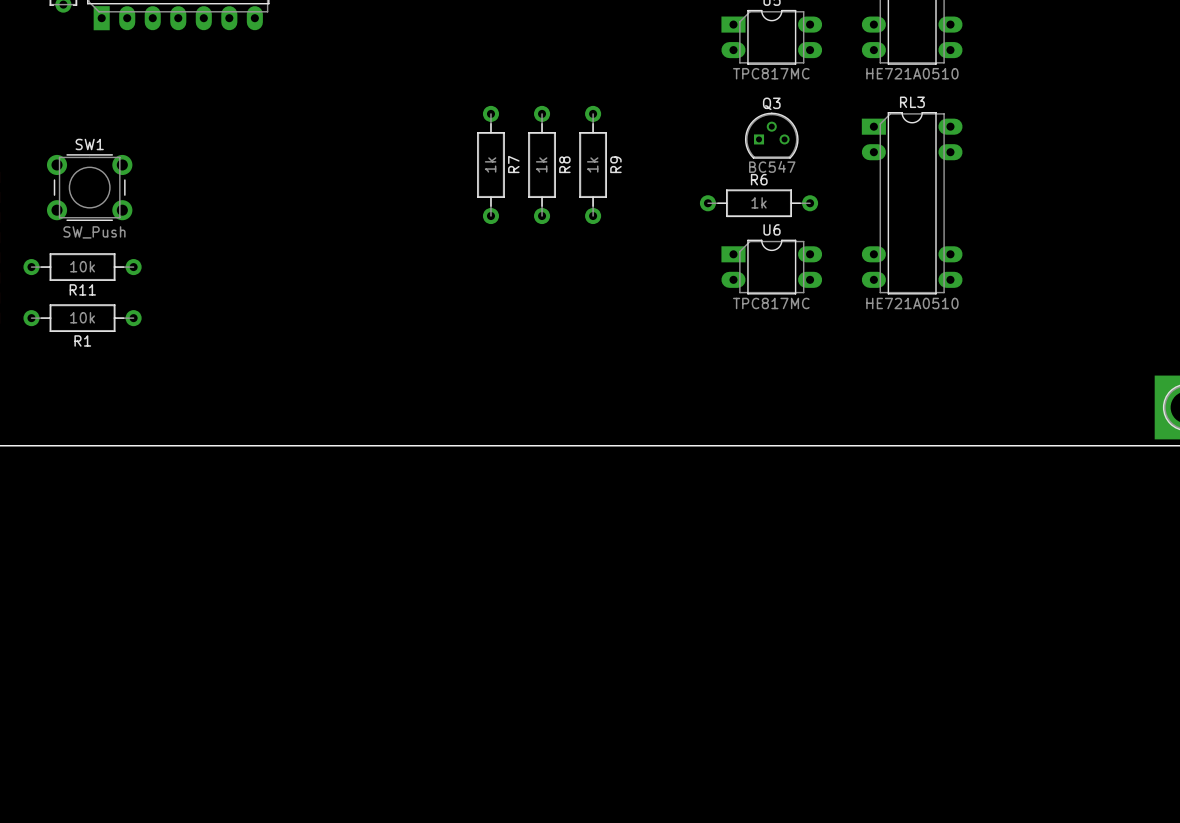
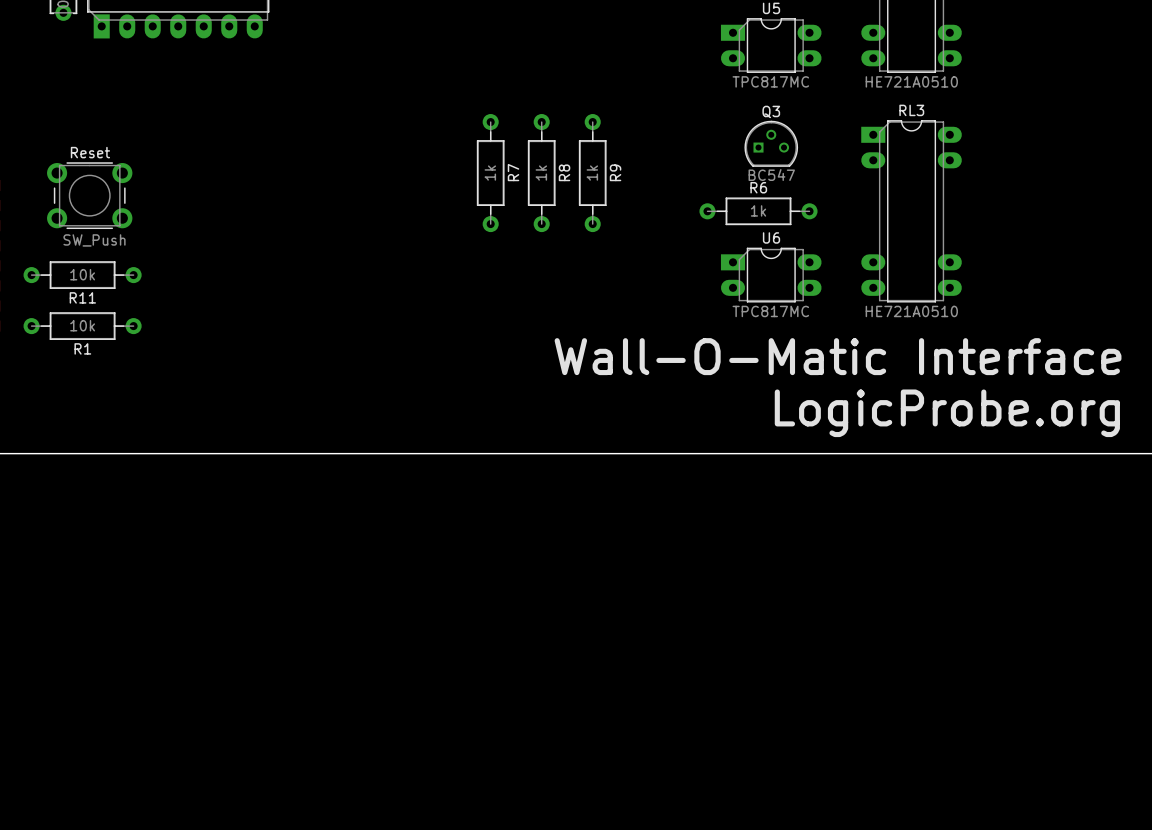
SW1 name: SW1 (89, 144) -> Reset (90, 152)
text: none -> Wall-O-Matic Interface (838, 356)
text: none -> LogicProbe.org (947, 413)

